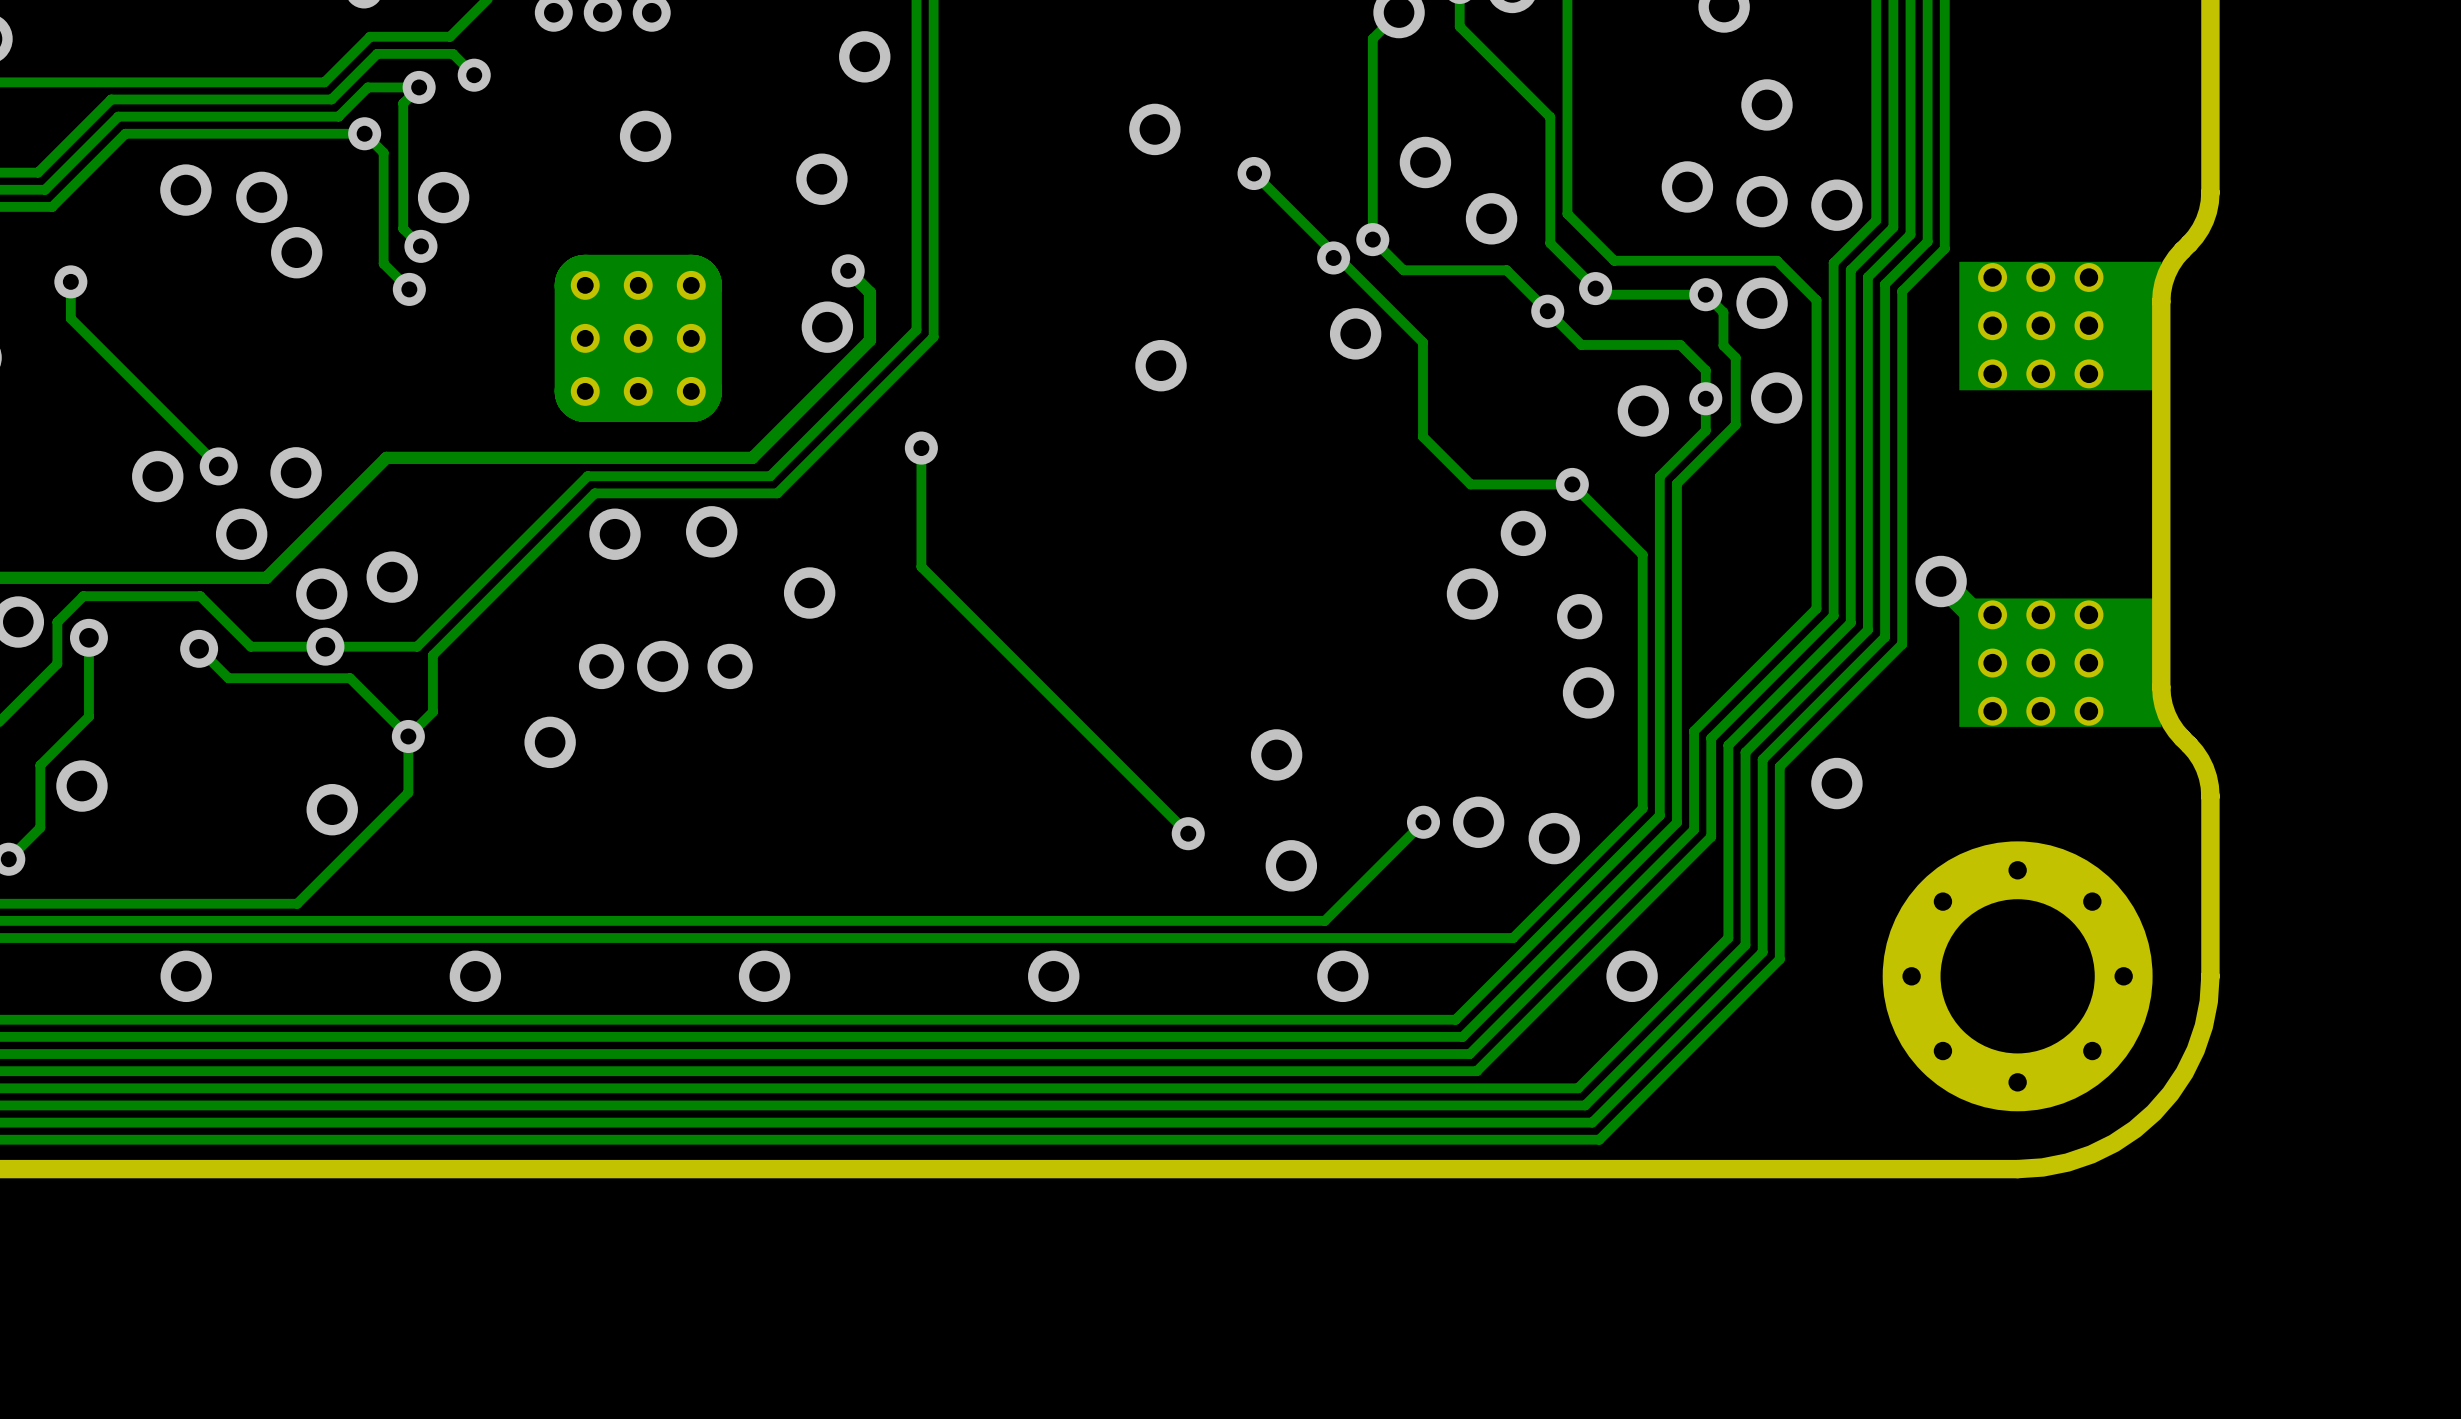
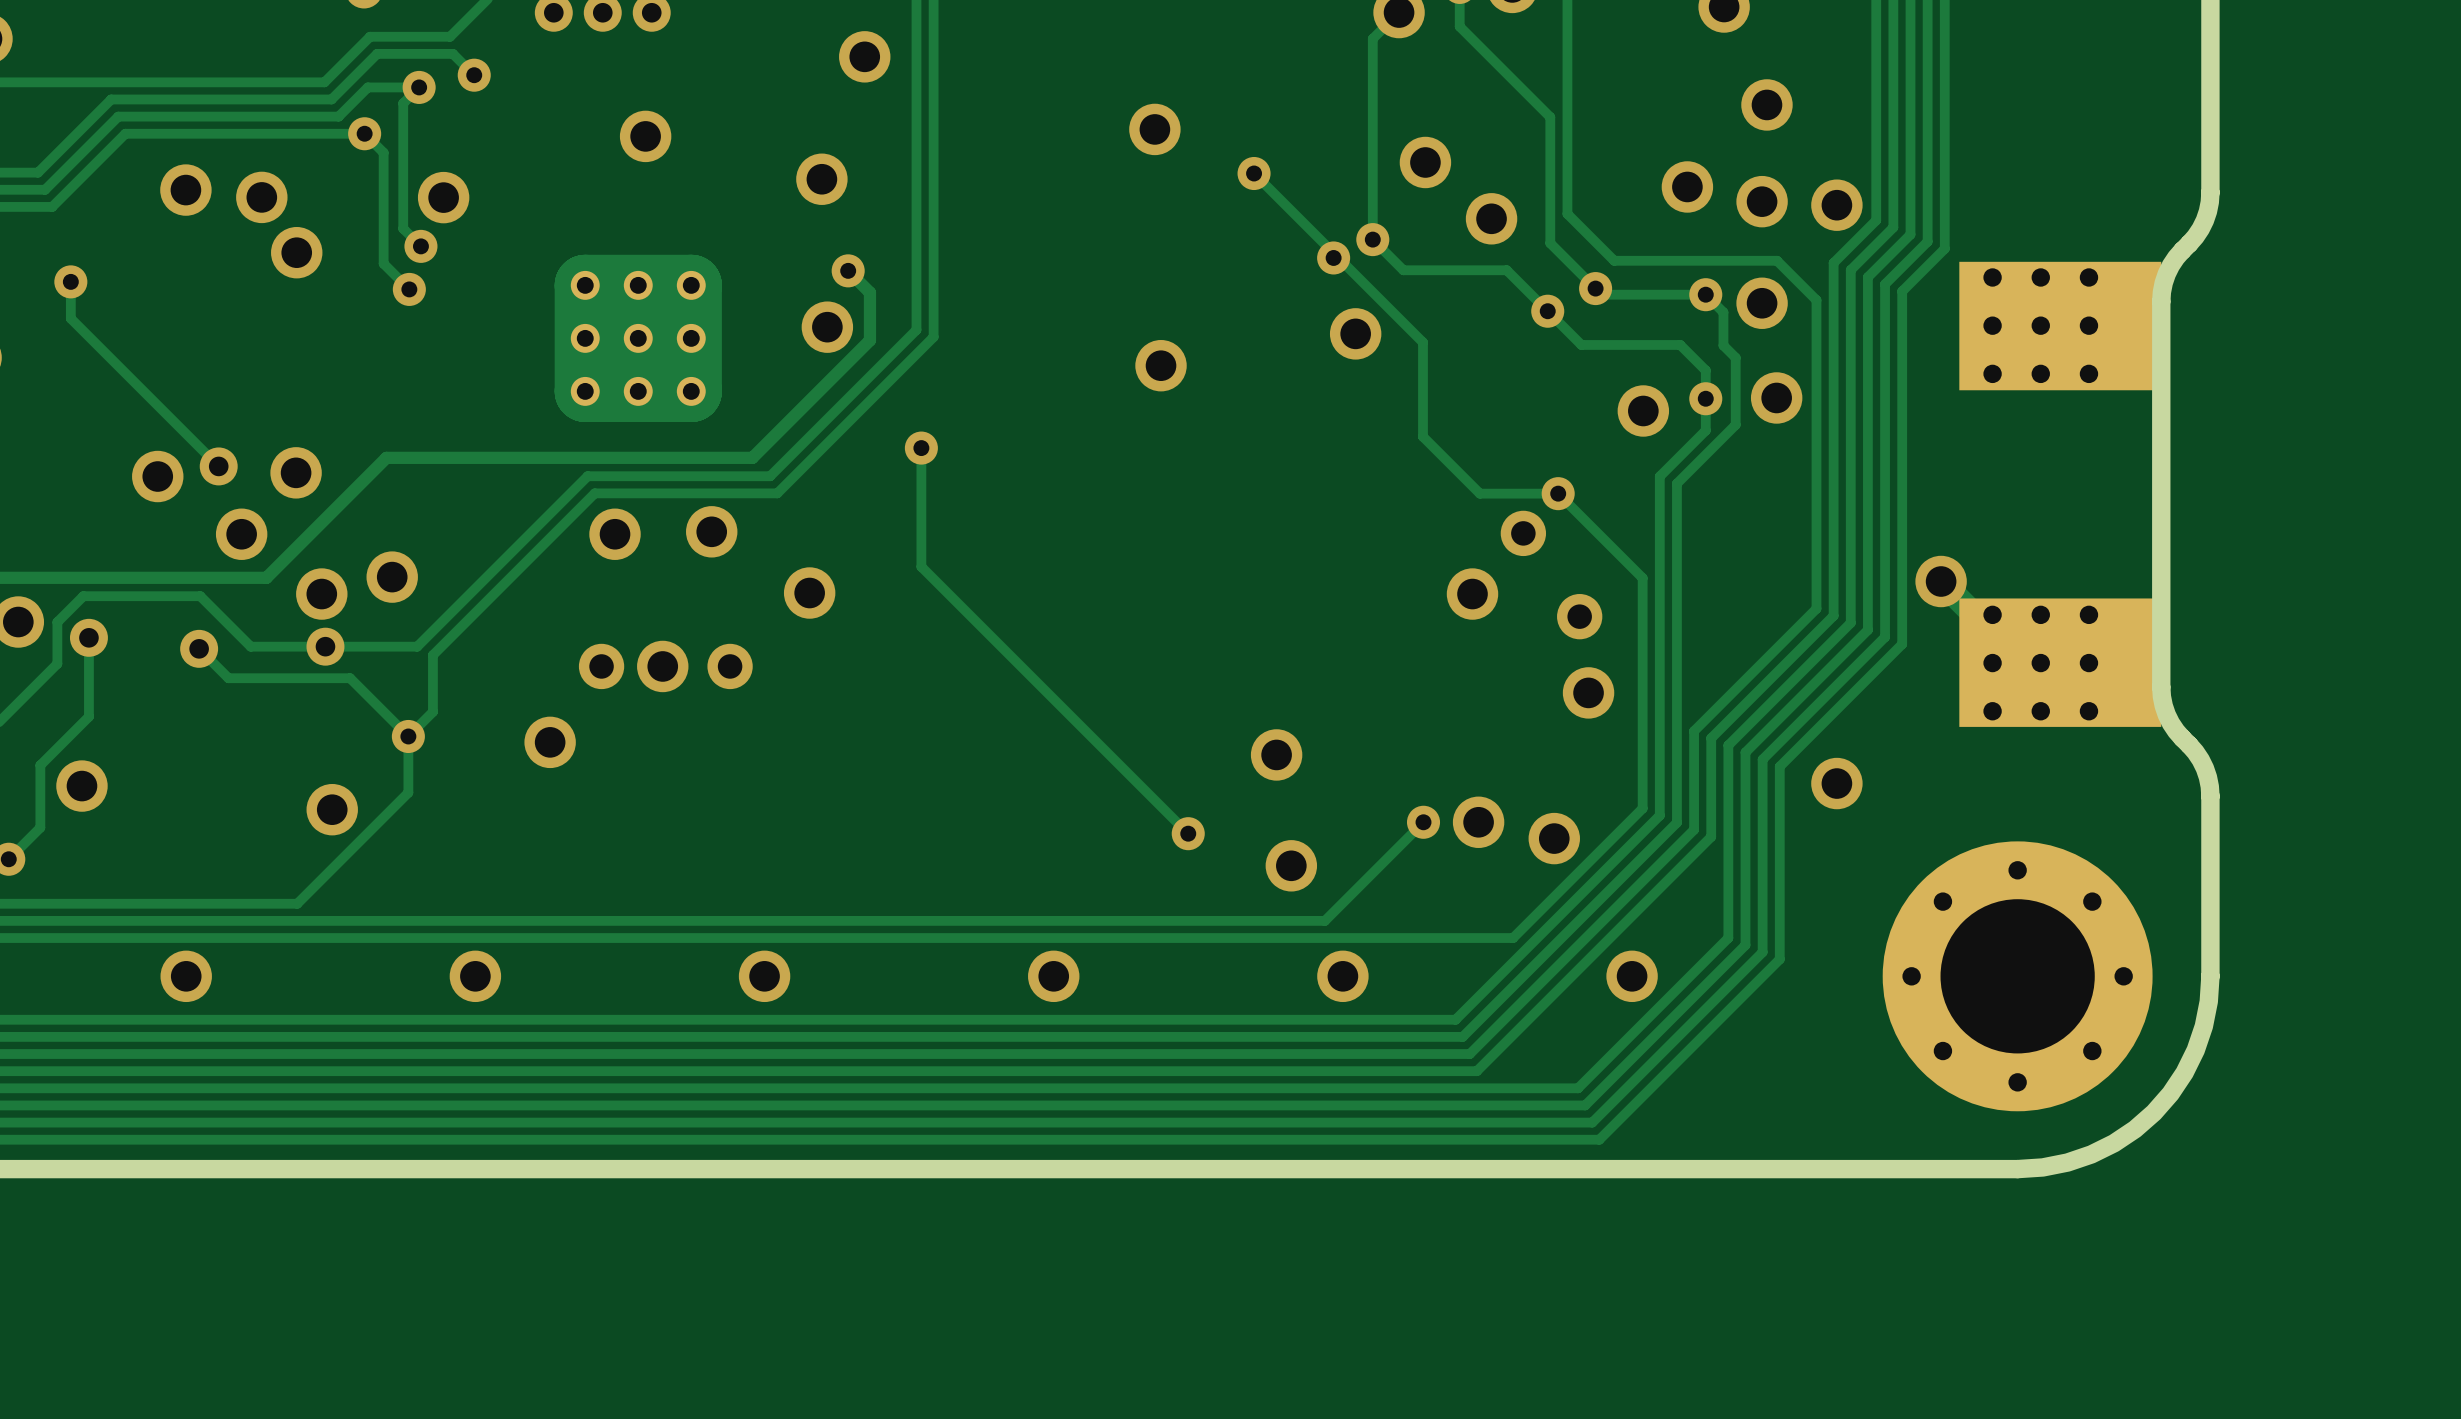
track: (1470, 484) (1572, 484) (1642, 554) (1642, 578) -> (1470, 484) (1479, 493) (1558, 493) (1642, 578)
via position: (1572, 484) -> (1558, 493)

